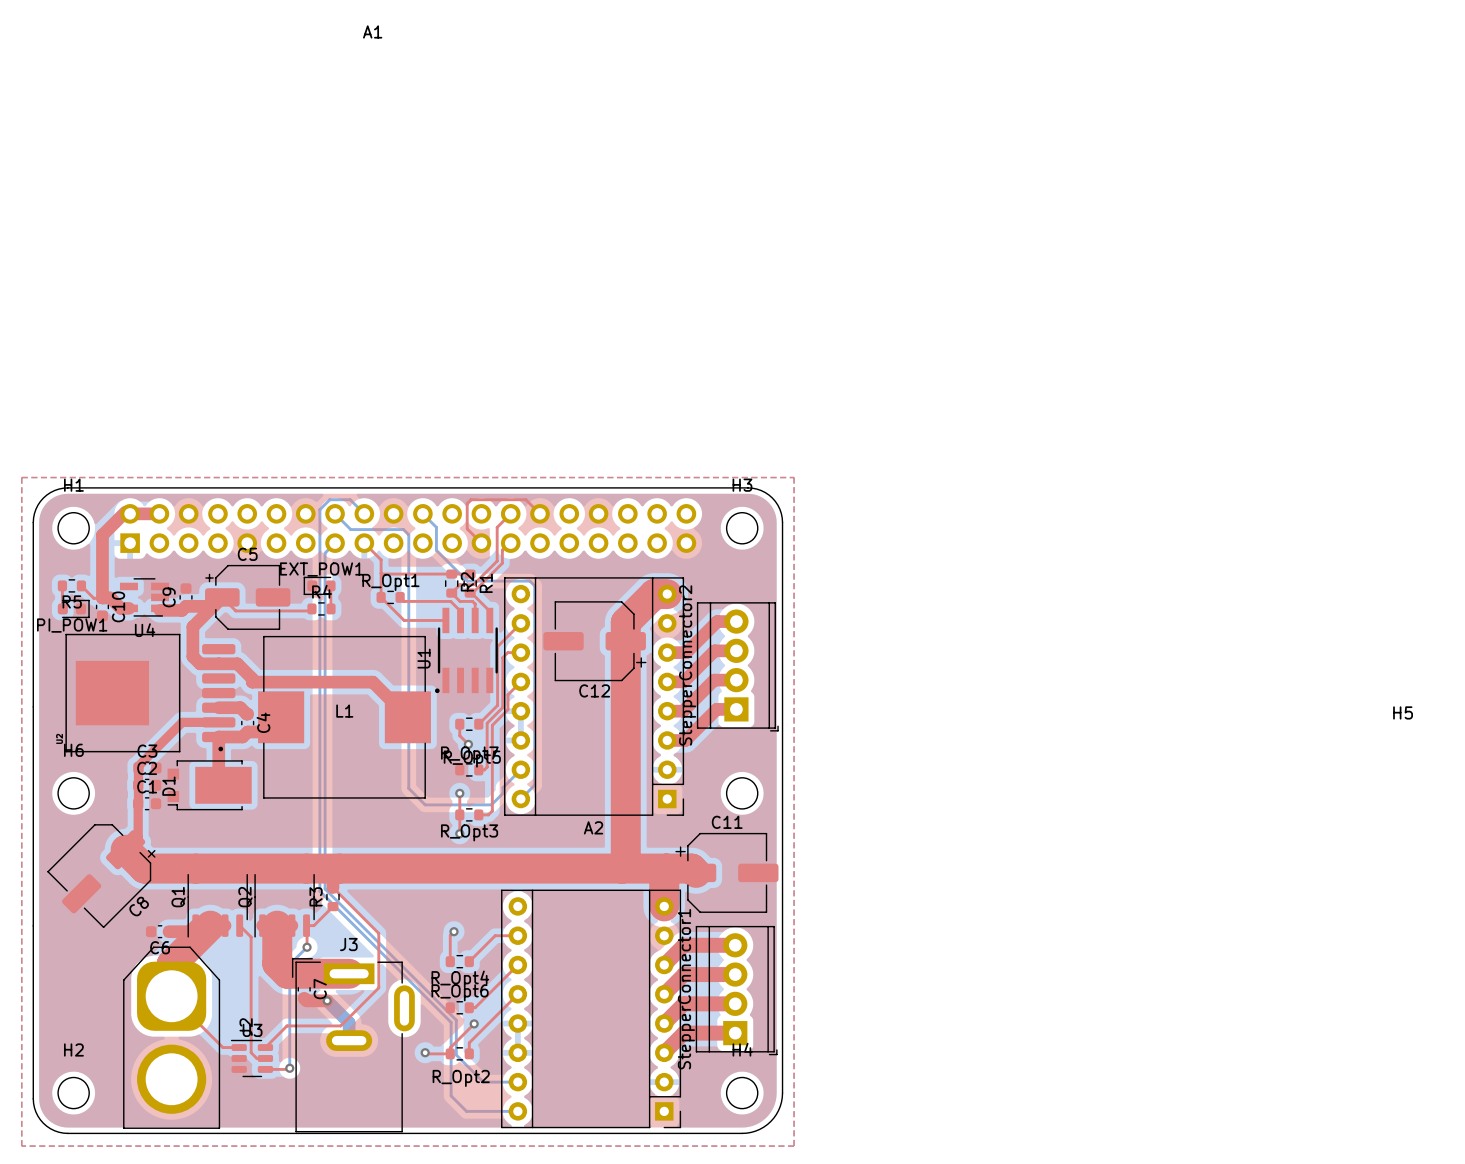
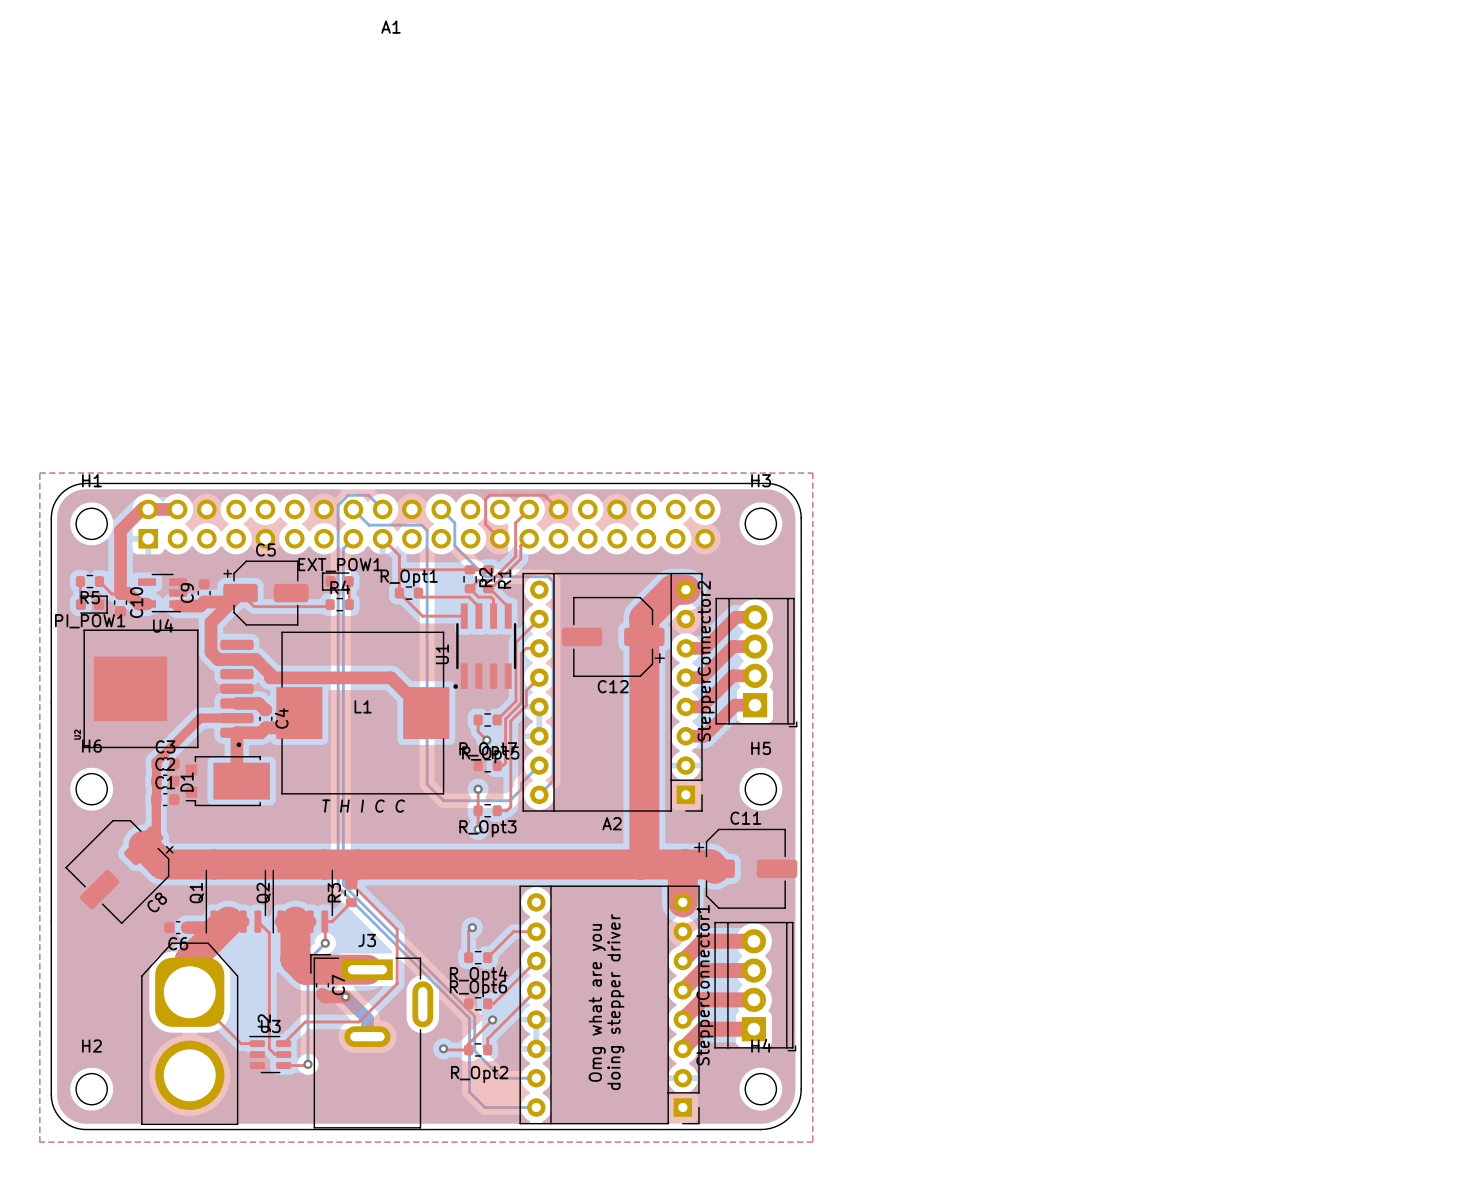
H5 name position: H5 (1403, 712) -> H5 (761, 748)
text: none -> T H I C C (363, 806)
text: none -> Omg what are you (597, 1002)
text: none -> doing stepper driver (615, 1002)

